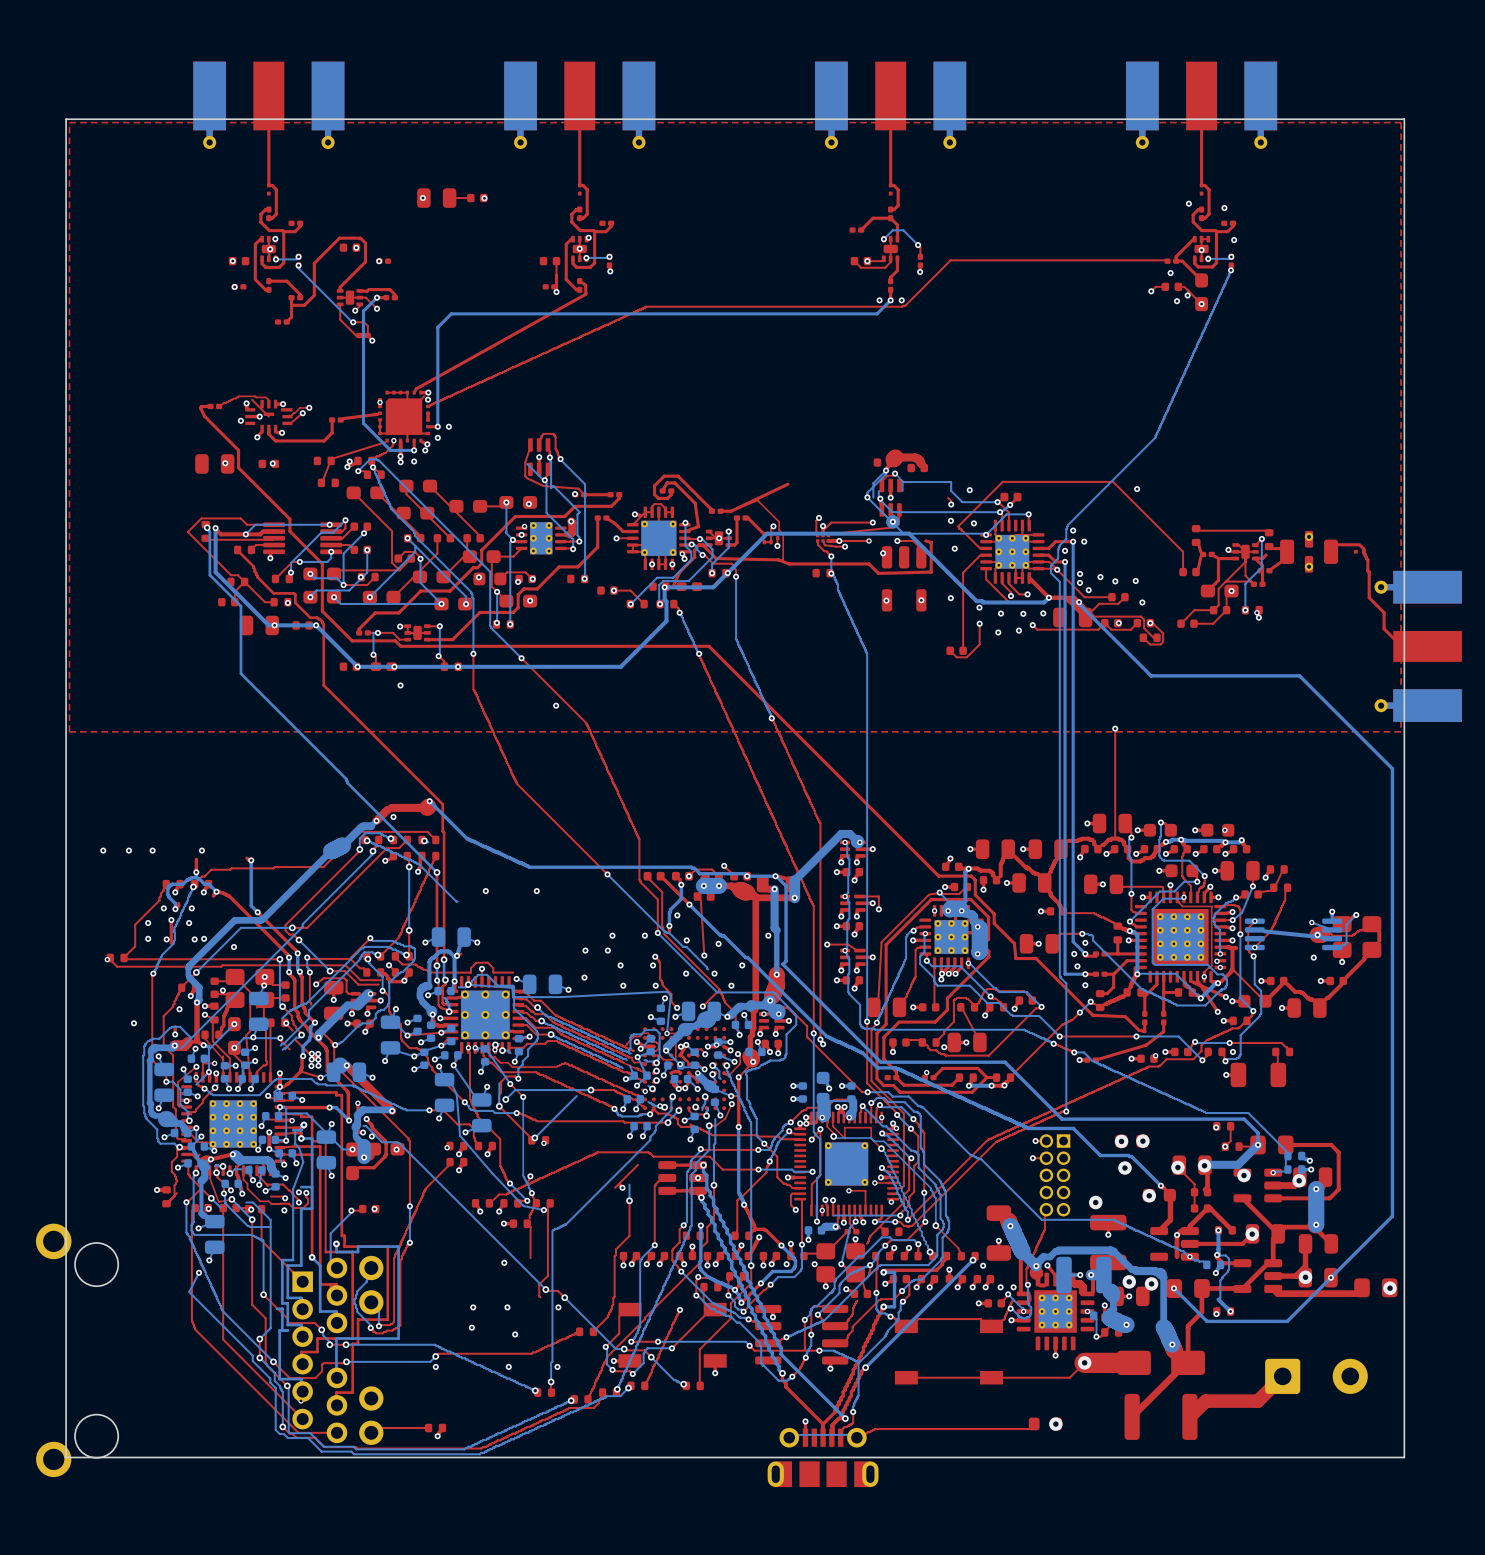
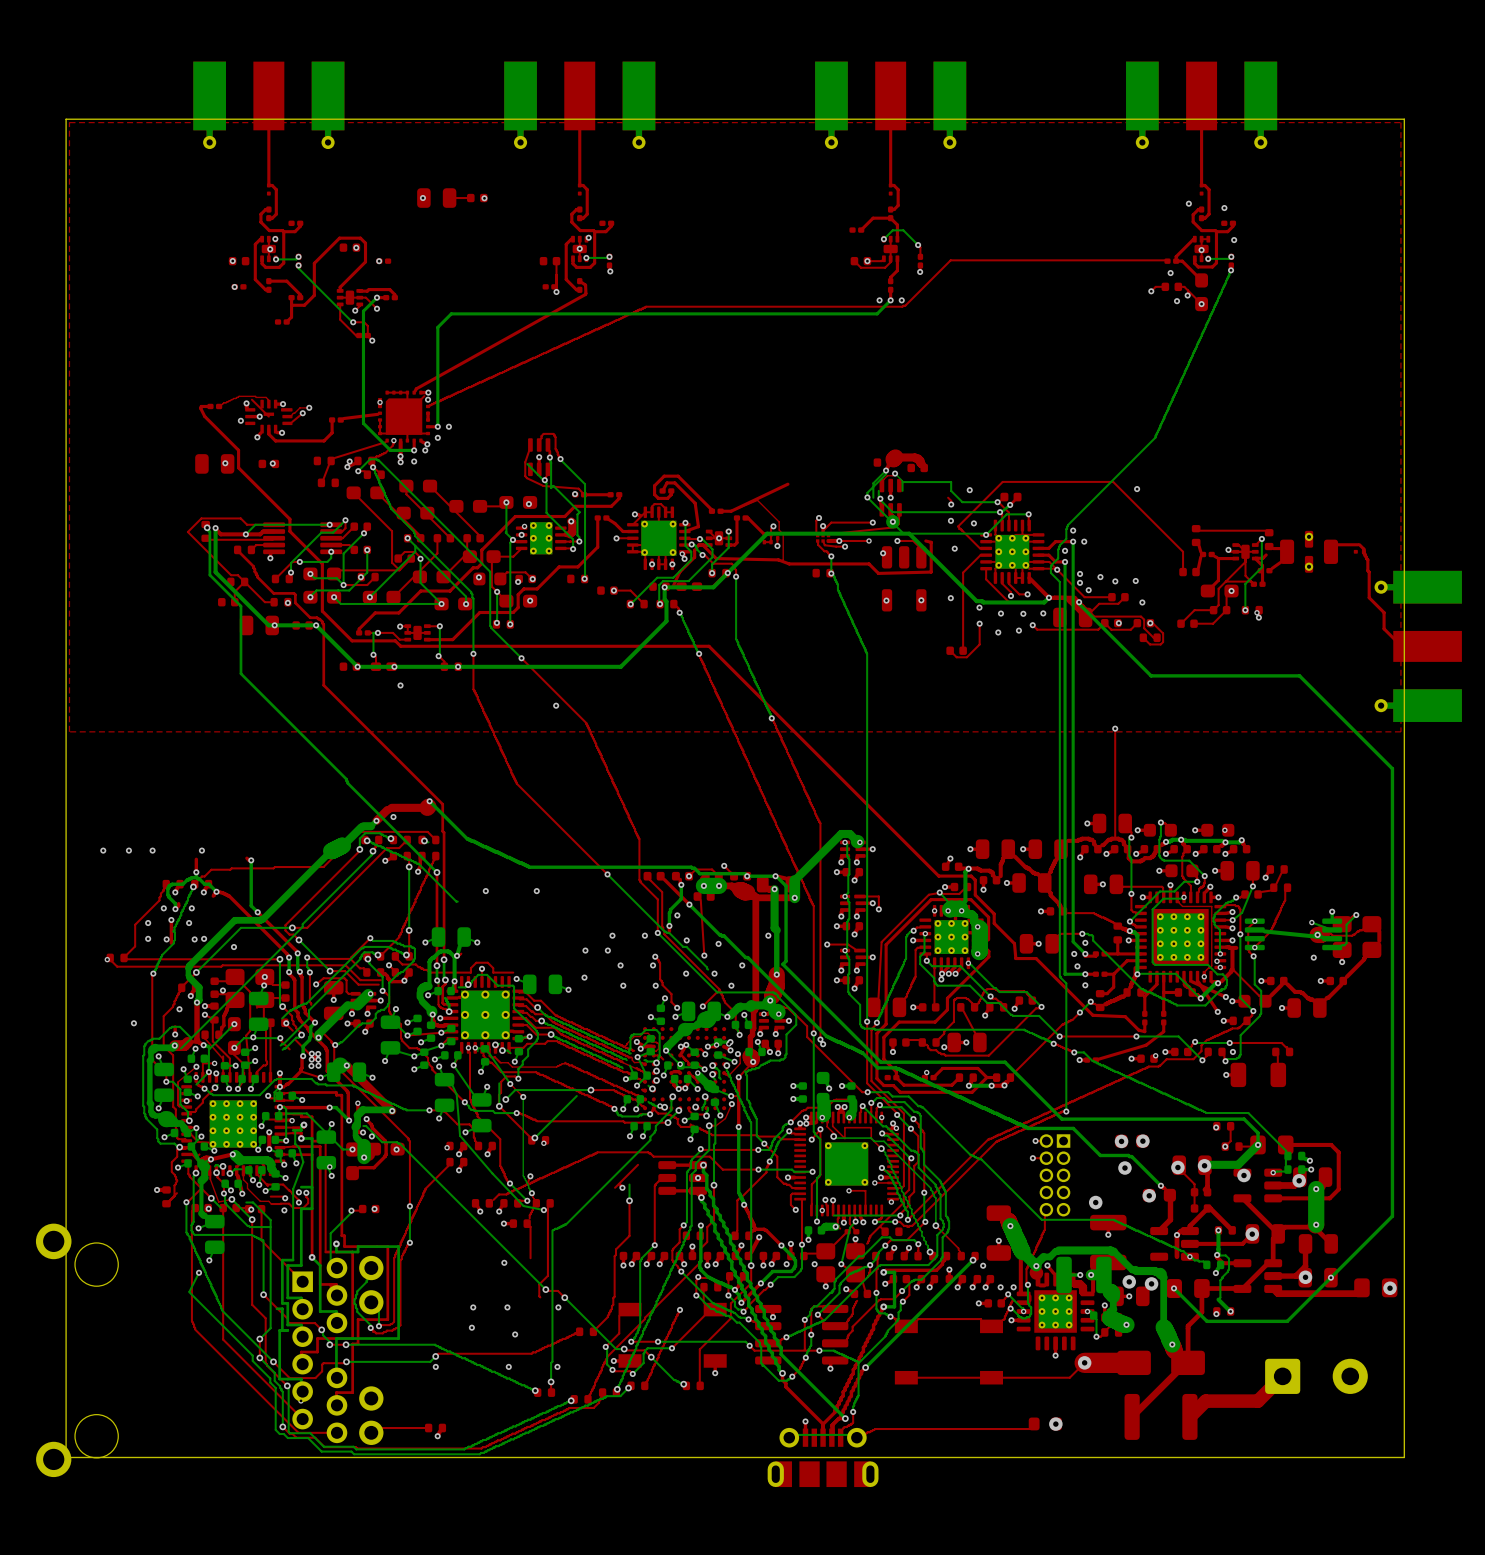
bottom track: (468, 984) (512, 987) (512, 997) (561, 997) (667, 991) (670, 995) (667, 1033) -> none
top track: (667, 1033) (675, 1033) (675, 1059) (663, 1059) -> none
via: (667, 1033) -> none
via: none -> (728, 1043)
via: (495, 1049) -> none
via: (645, 1091) -> none
via: none -> (329, 1166)

